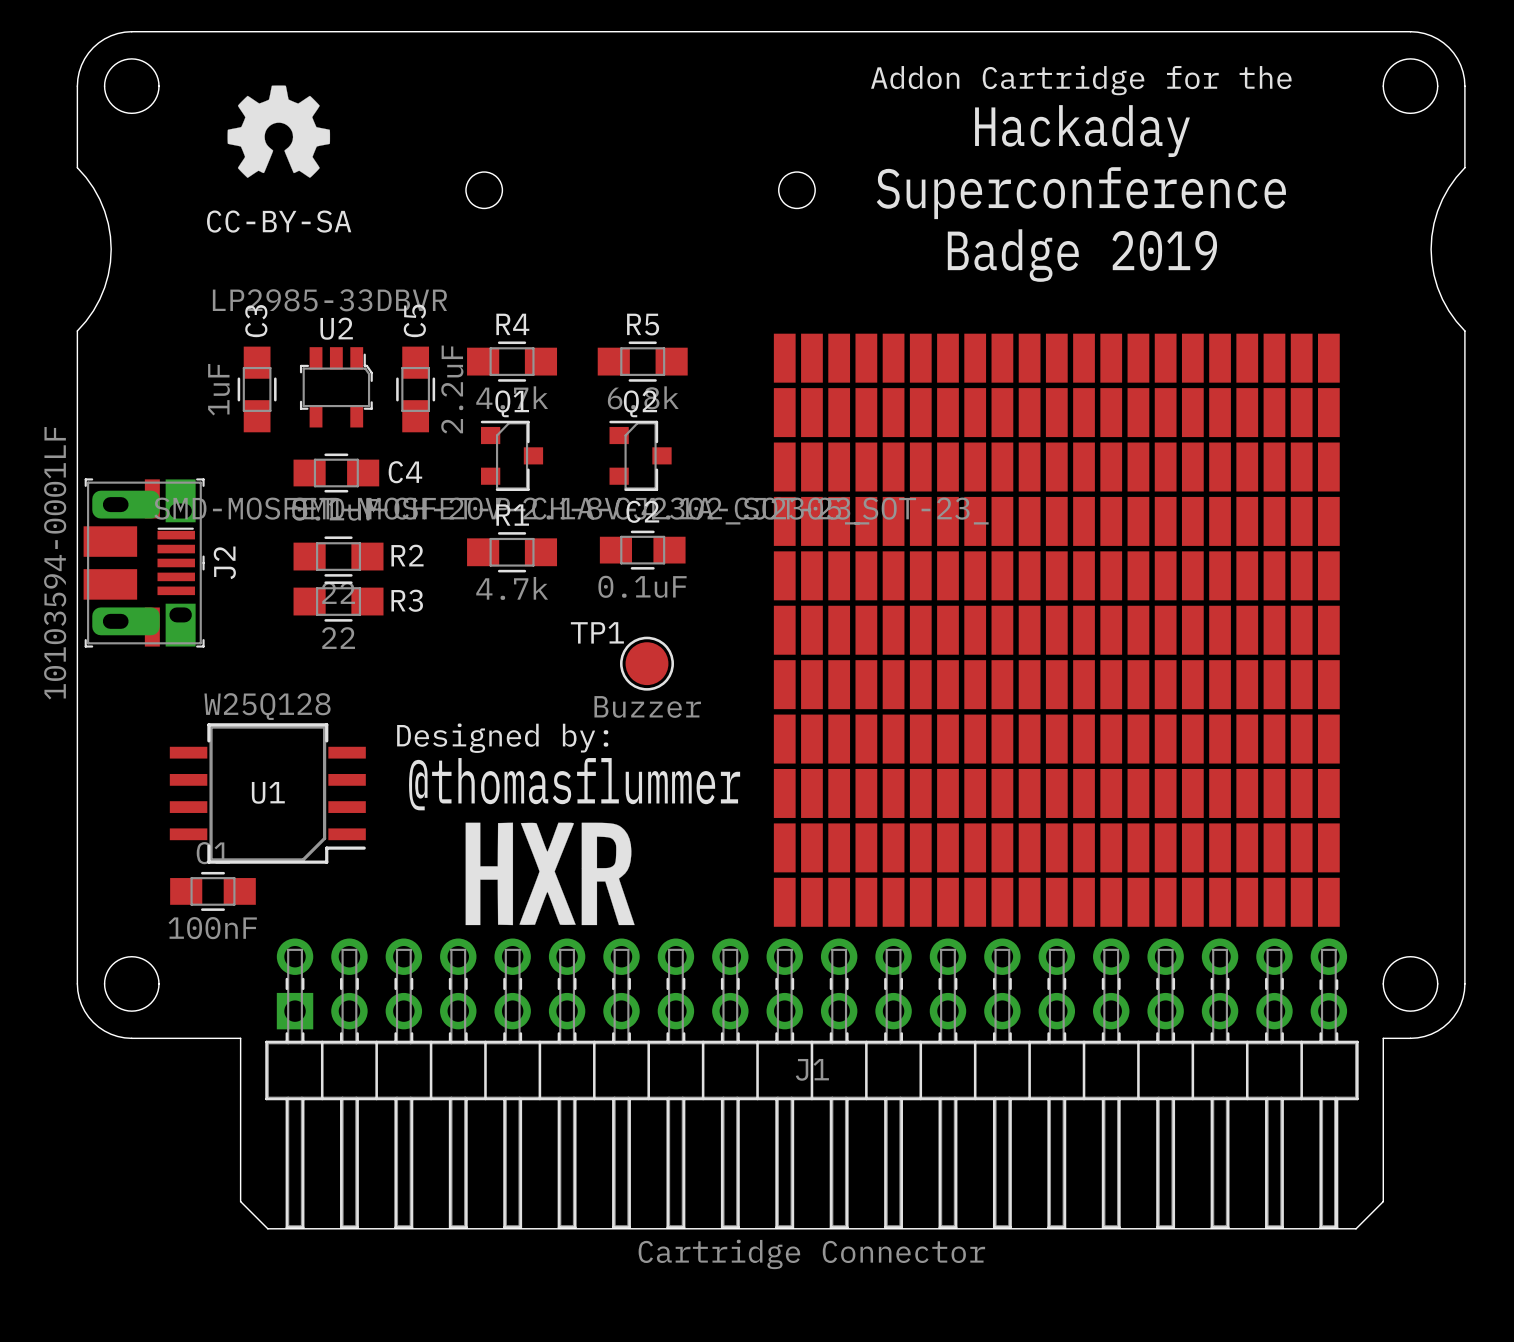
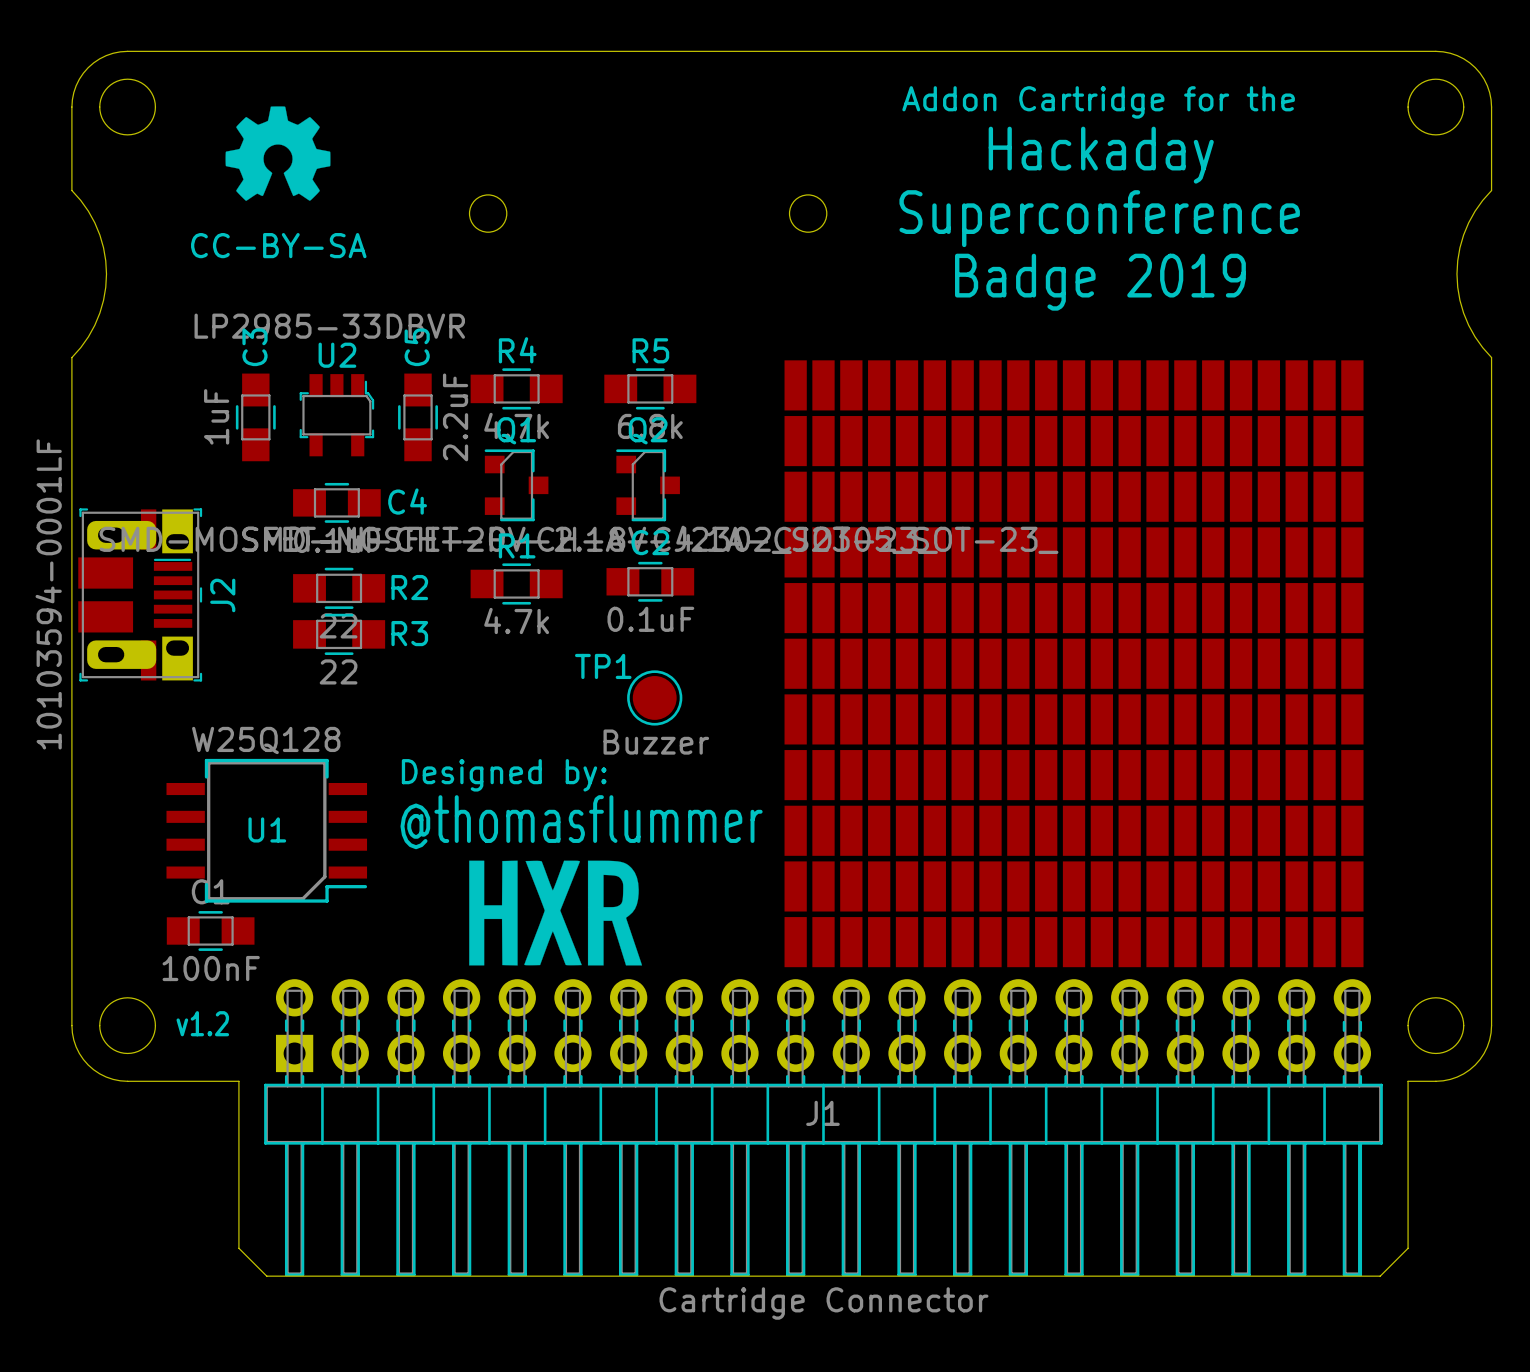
text: none -> v1.2 (202, 1023)

